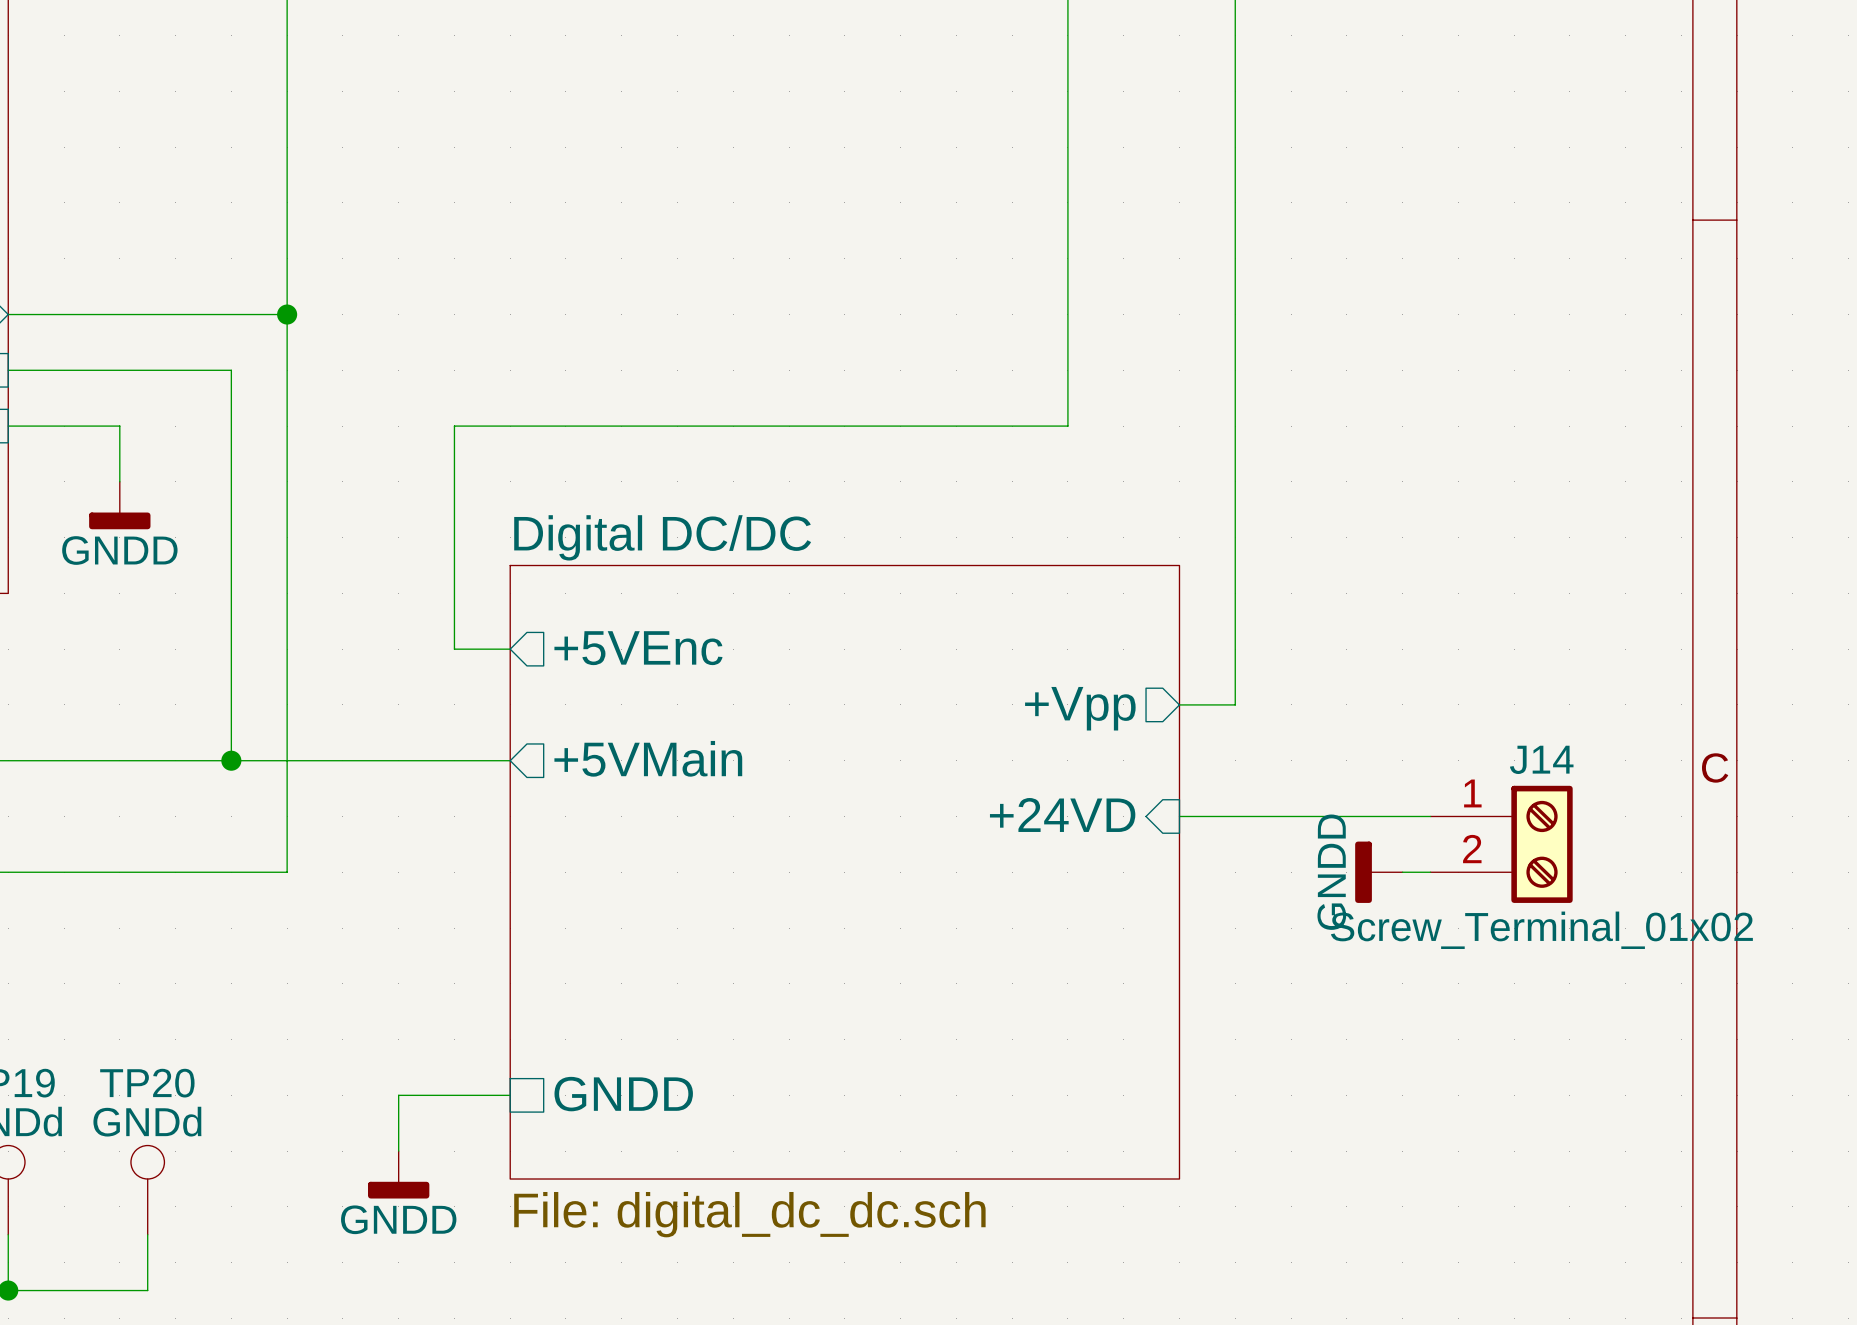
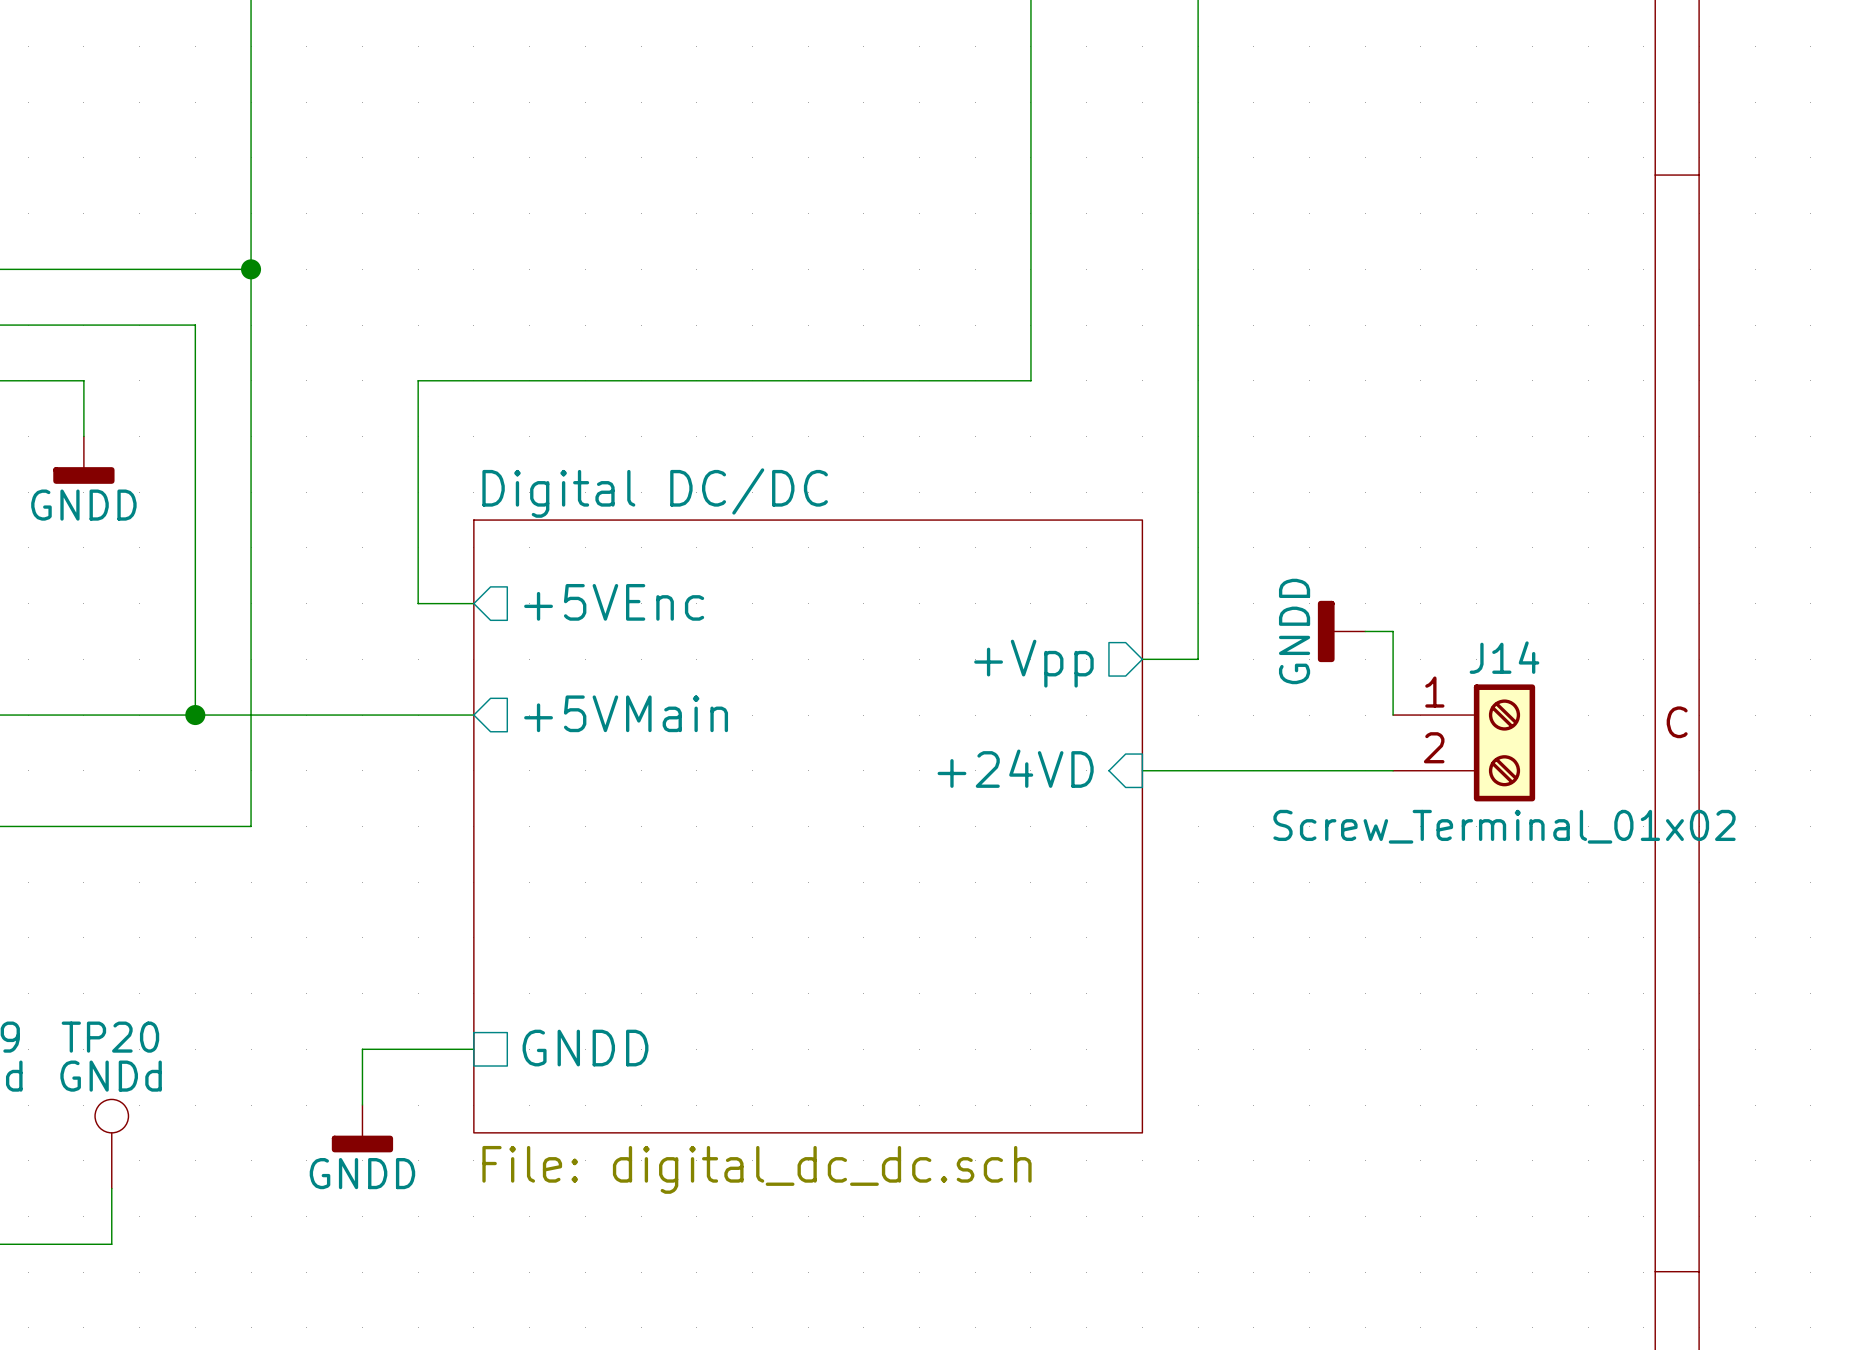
wire: none -> (1365, 631) (1393, 631) (1393, 715)
J14 position: (1501, 844) -> (1464, 742)
power symbol position: GNDD (1378, 872) -> GNDD (1341, 631)

